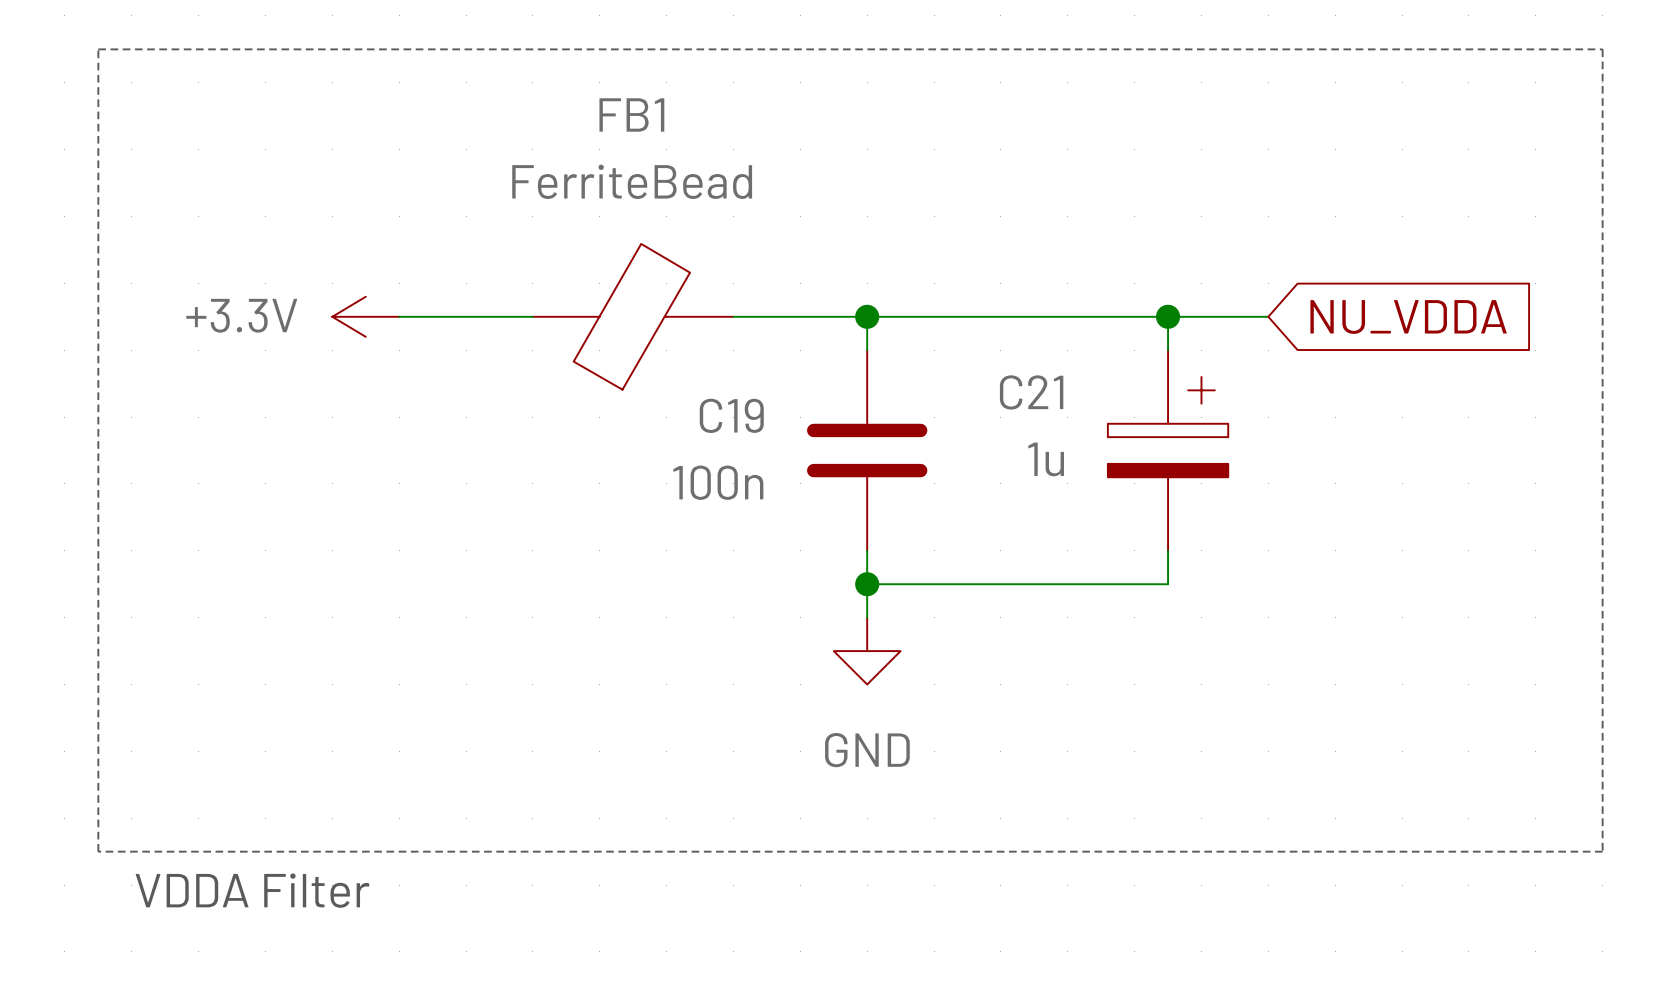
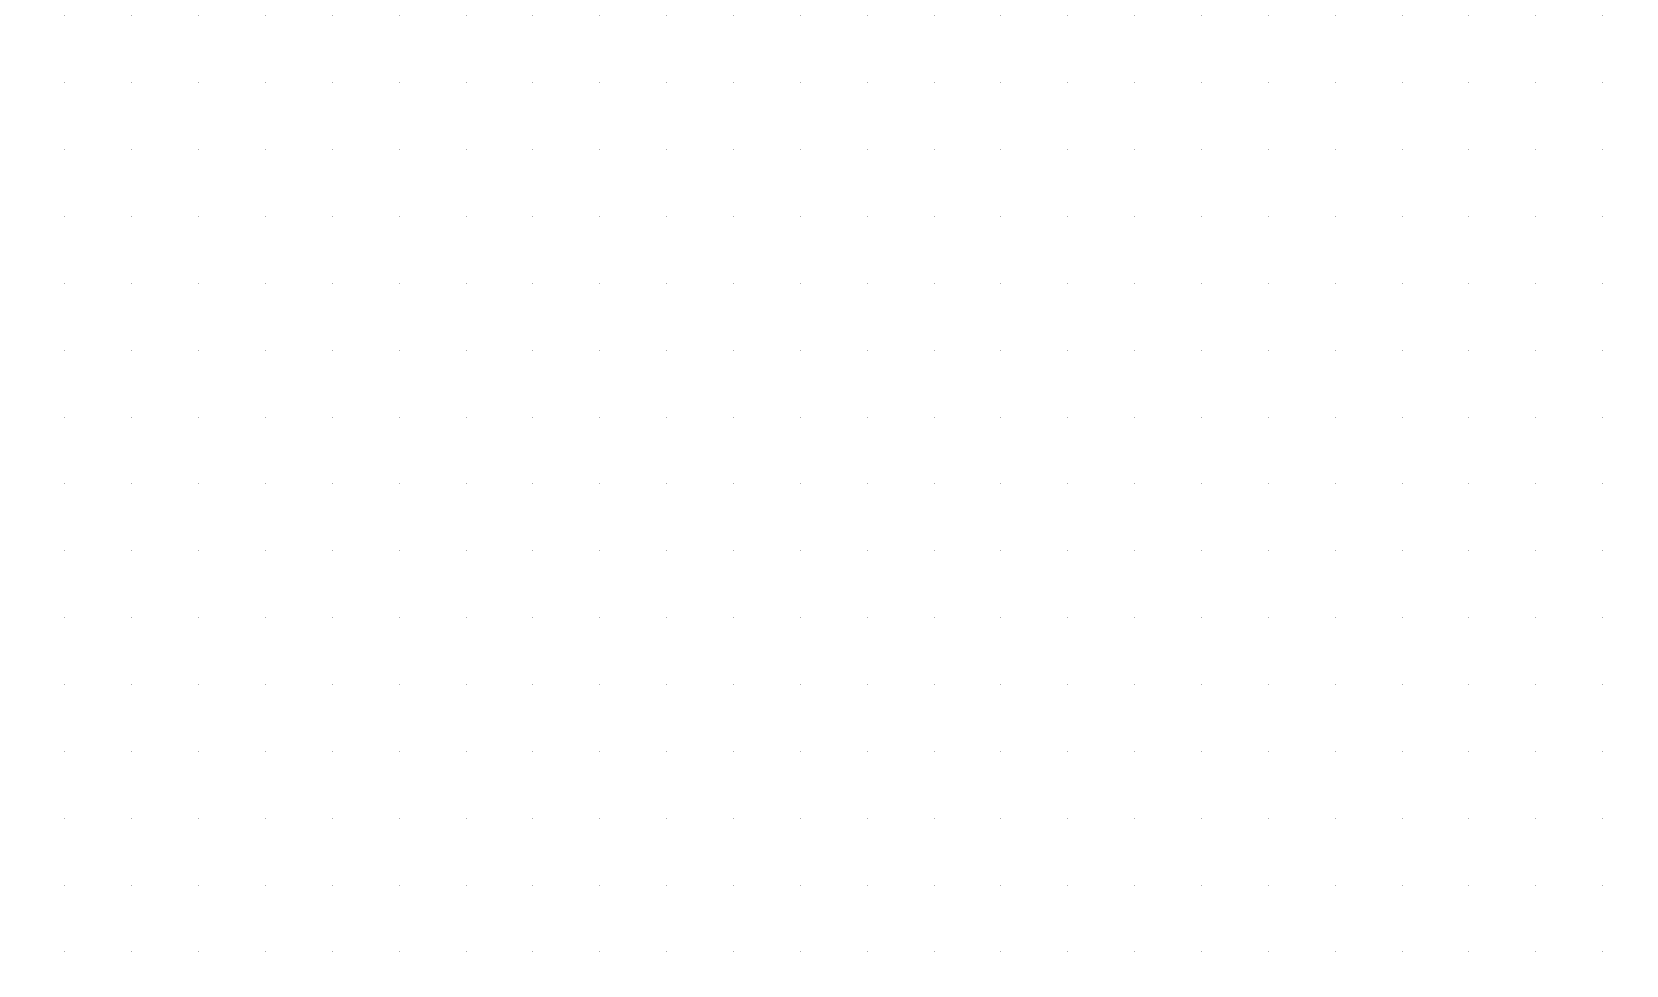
line: (98, 49) (1602, 49) (1602, 851) (98, 851) (98, 49) -> none
power symbol: +3.3V (365, 316) -> none
wire: (399, 316) (532, 316) -> none
FB1: FerriteBead (633, 316) -> none
wire: (733, 316) (1268, 316) -> none
wire: (867, 316) (867, 350) -> none
junction: (867, 316) -> none
wire: (1168, 316) (1168, 350) -> none
junction: (1168, 316) -> none
global label: NU_VDDA (1408, 316) -> none
C19: 100n (867, 450) -> none
C21: 1u (1168, 450) -> none
wire: (867, 550) (867, 617) -> none
wire: (1168, 550) (1168, 584) (867, 584) -> none
junction: (867, 584) -> none
power symbol: GND (867, 651) -> none
text: VDDA Filter (252, 890) -> none

